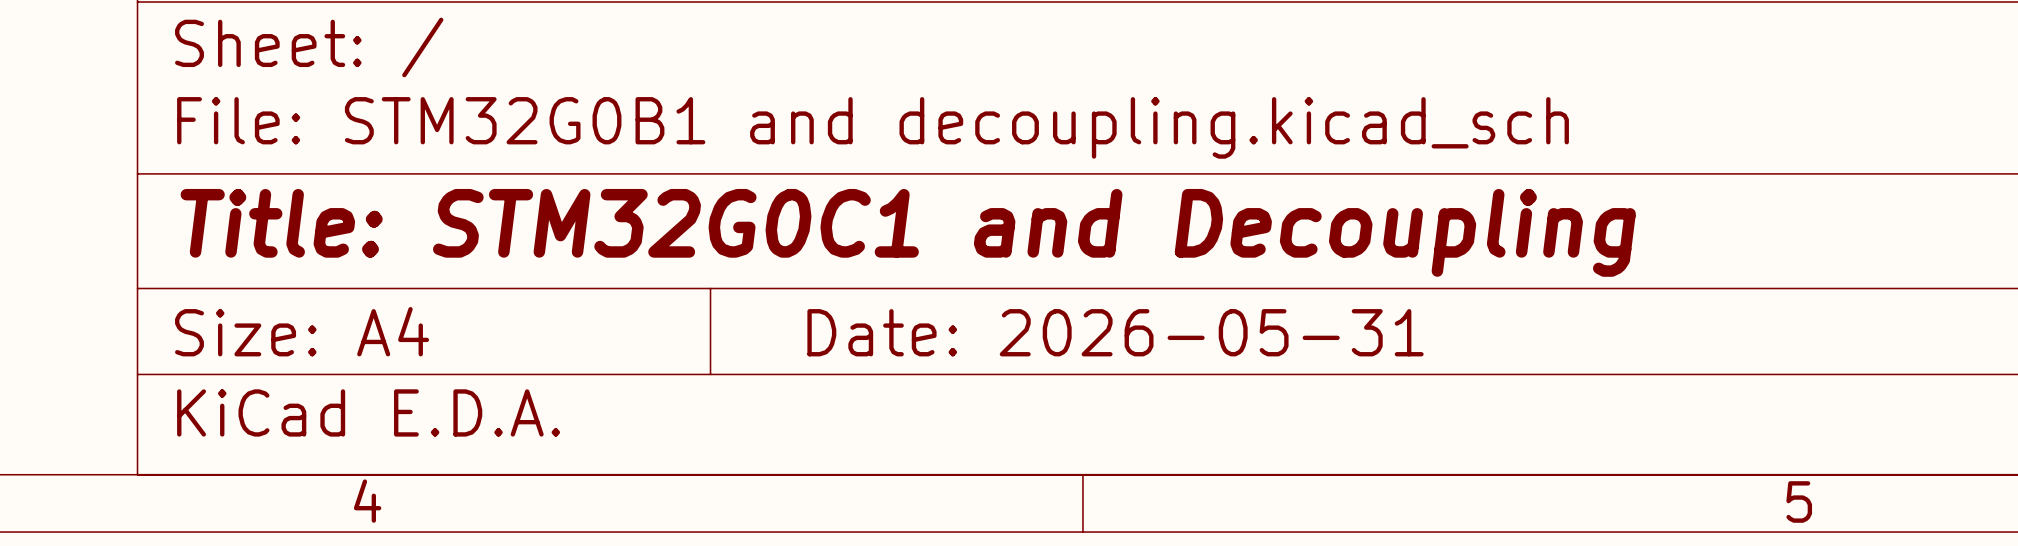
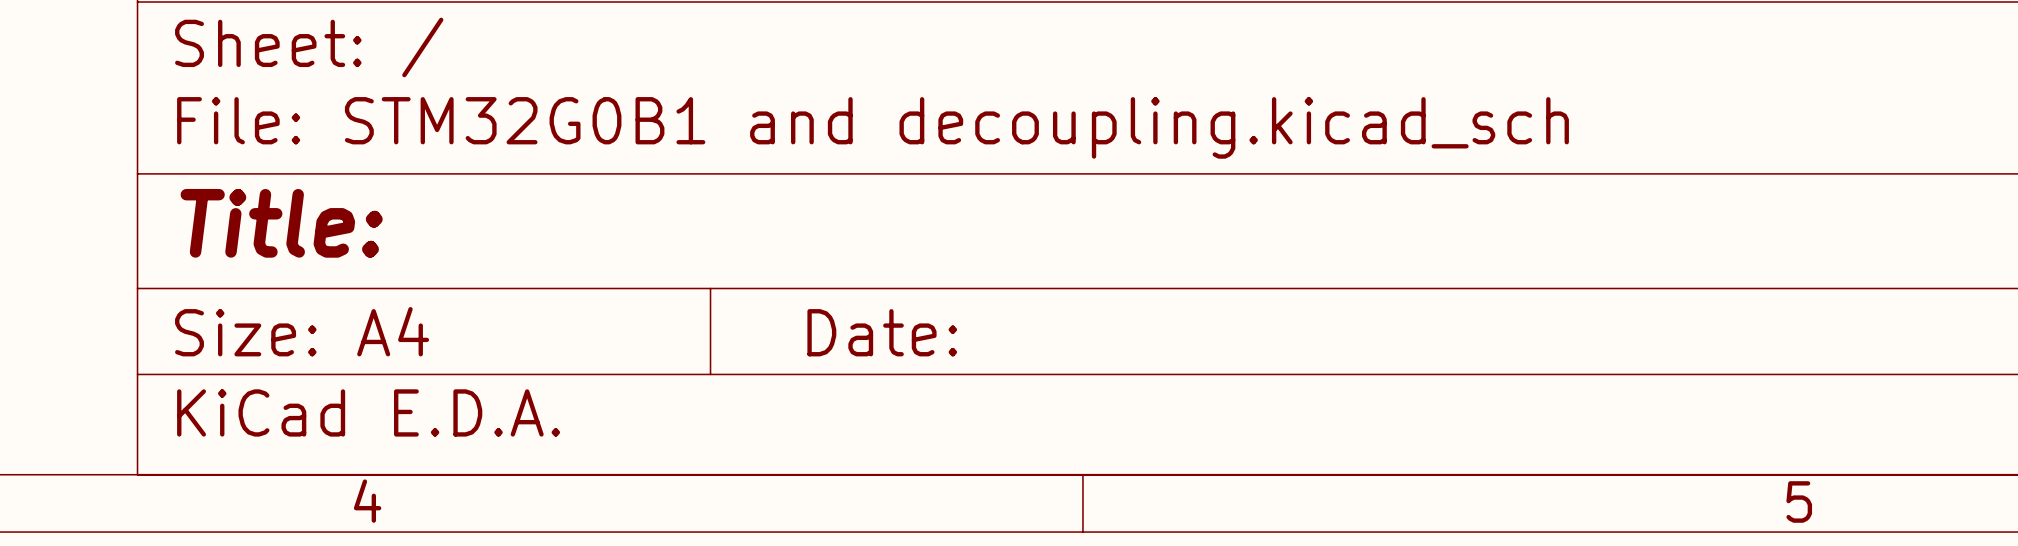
title block: Title: STM32G0C1 and Decoupling (908, 232) -> Title: (281, 223)
title block: Date: 2026-05-31 (1115, 332) -> Date: (882, 332)

